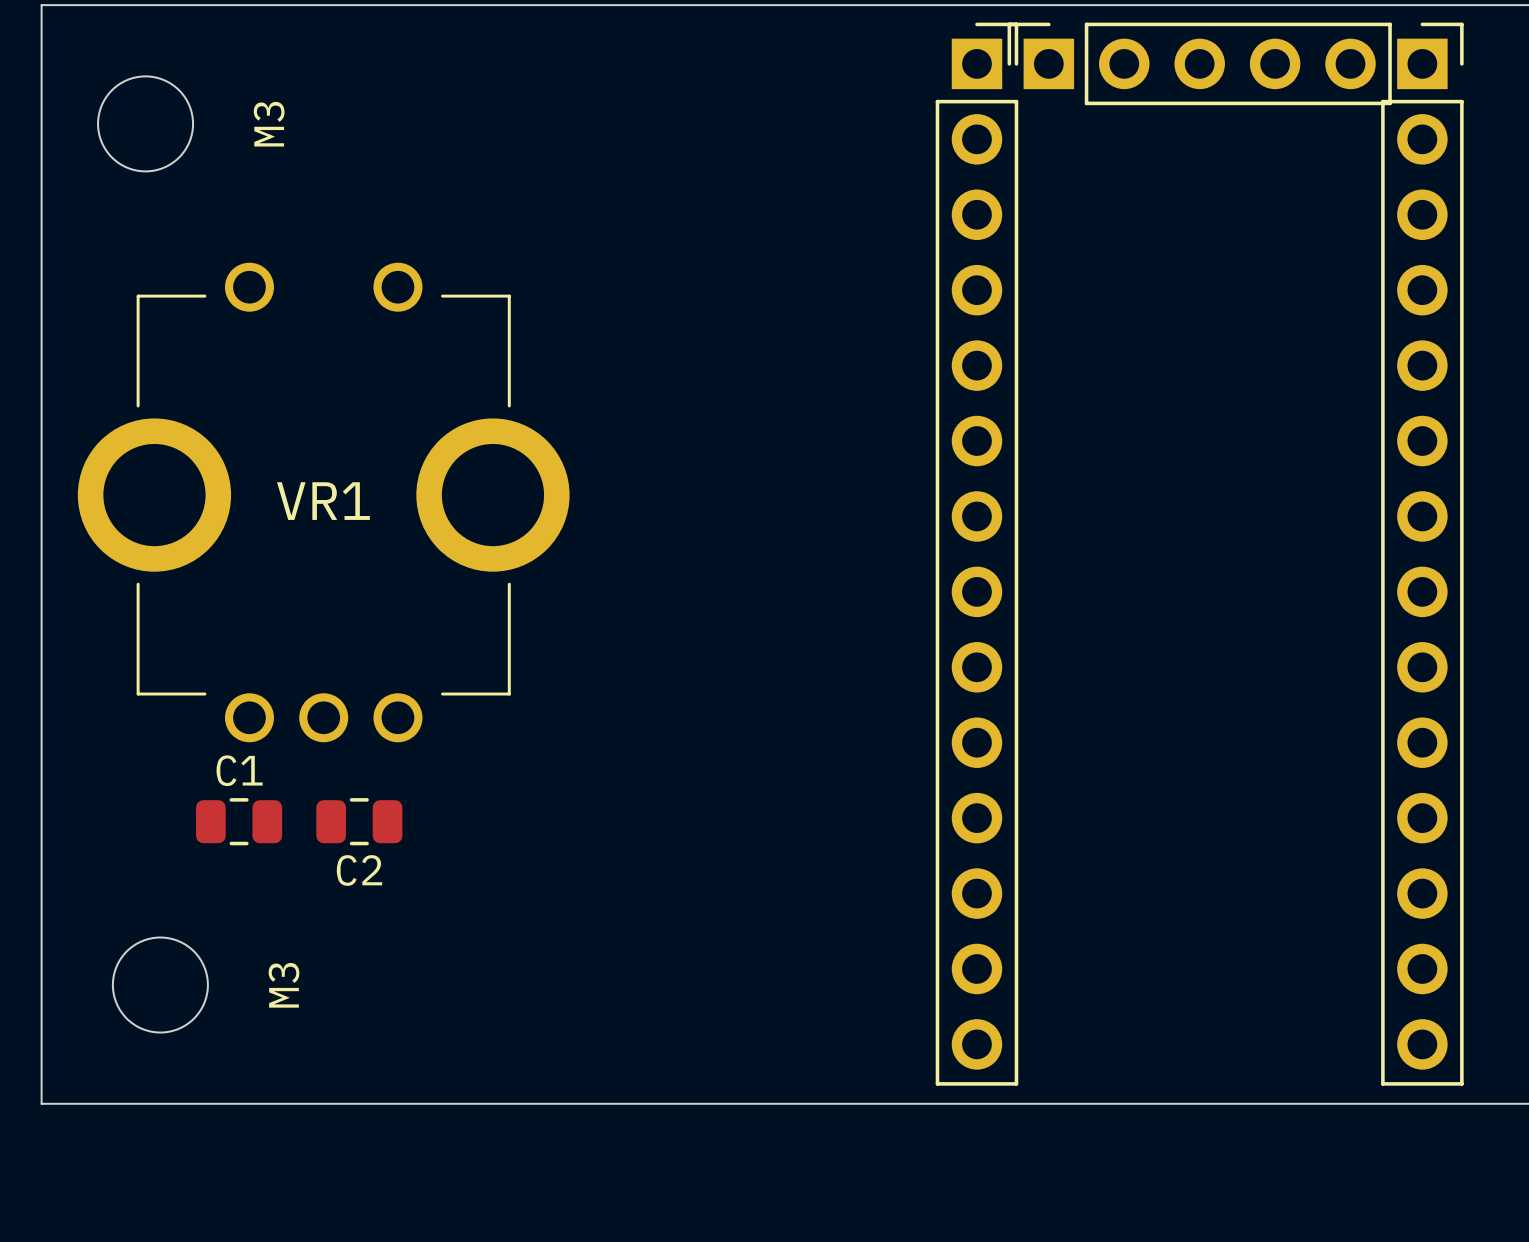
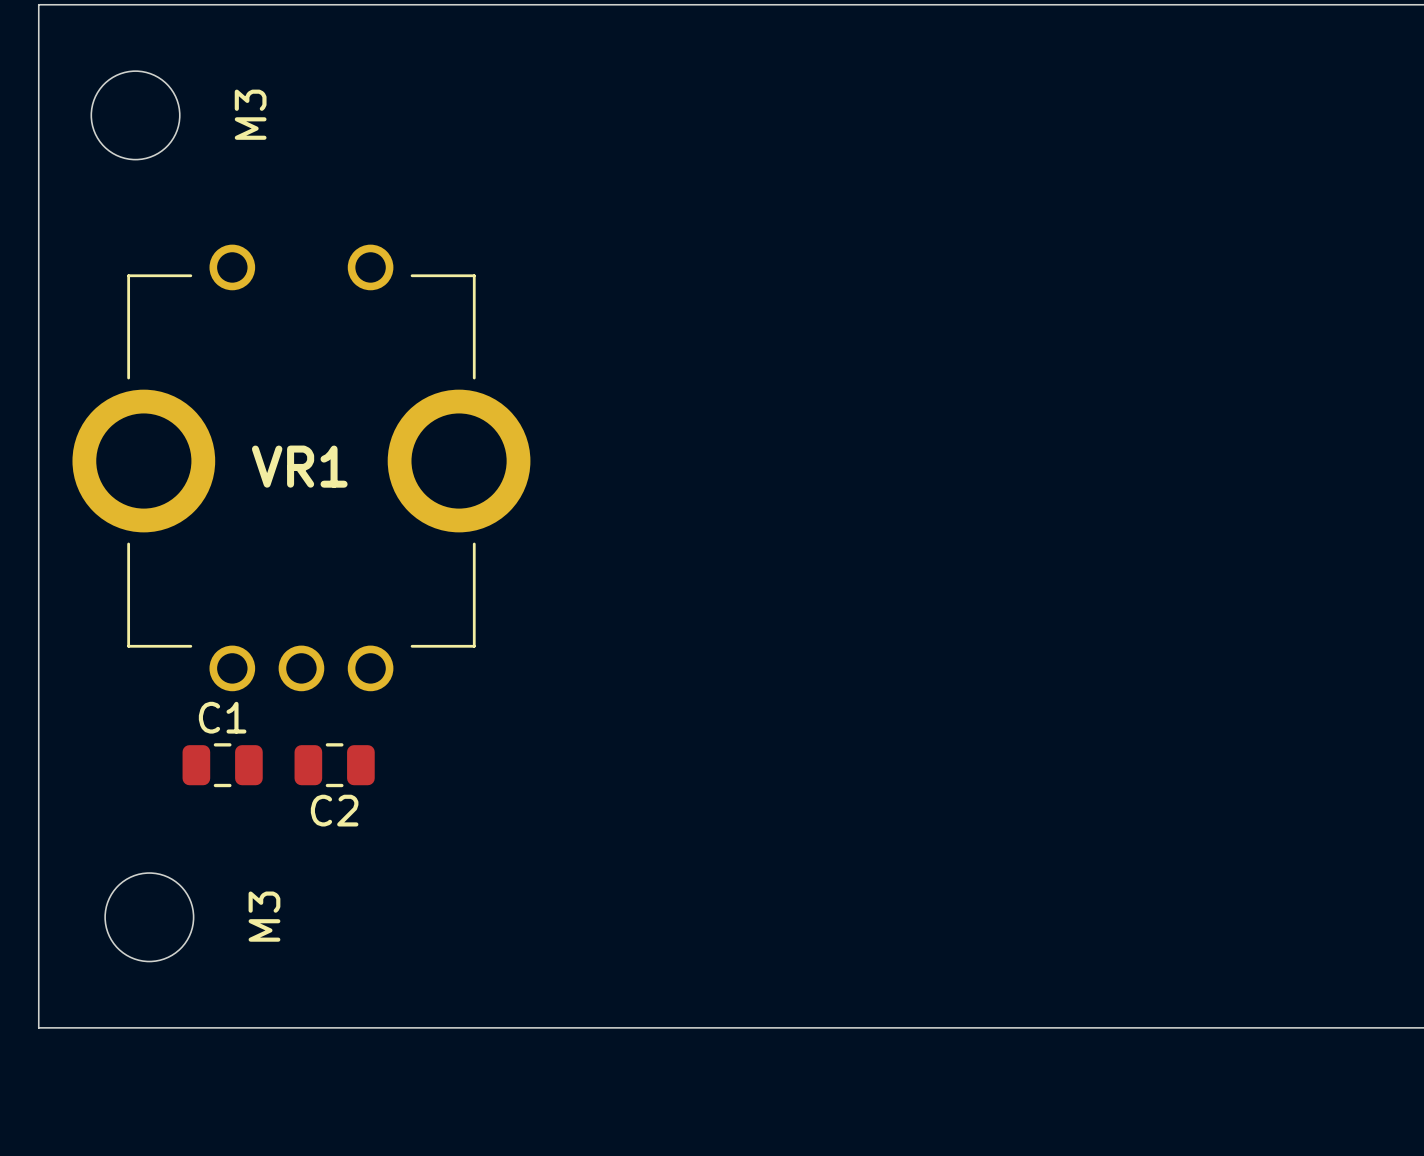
part: (1199, 63) -> none
part: (976, 554) -> none
part: (1422, 554) -> none

